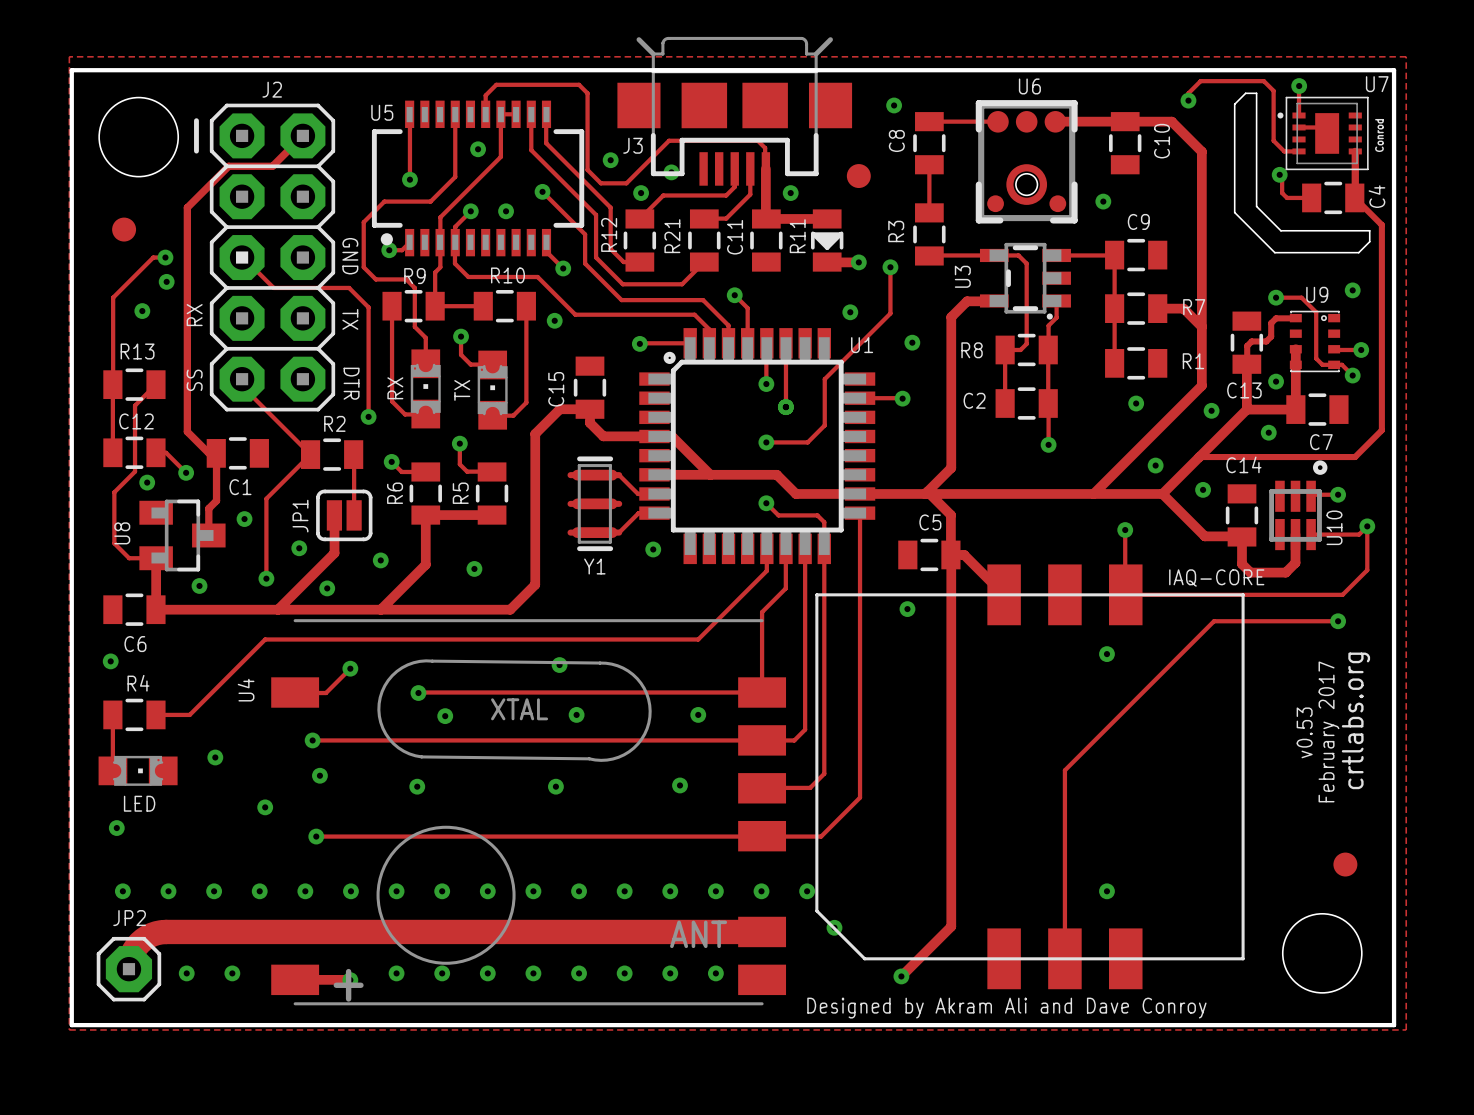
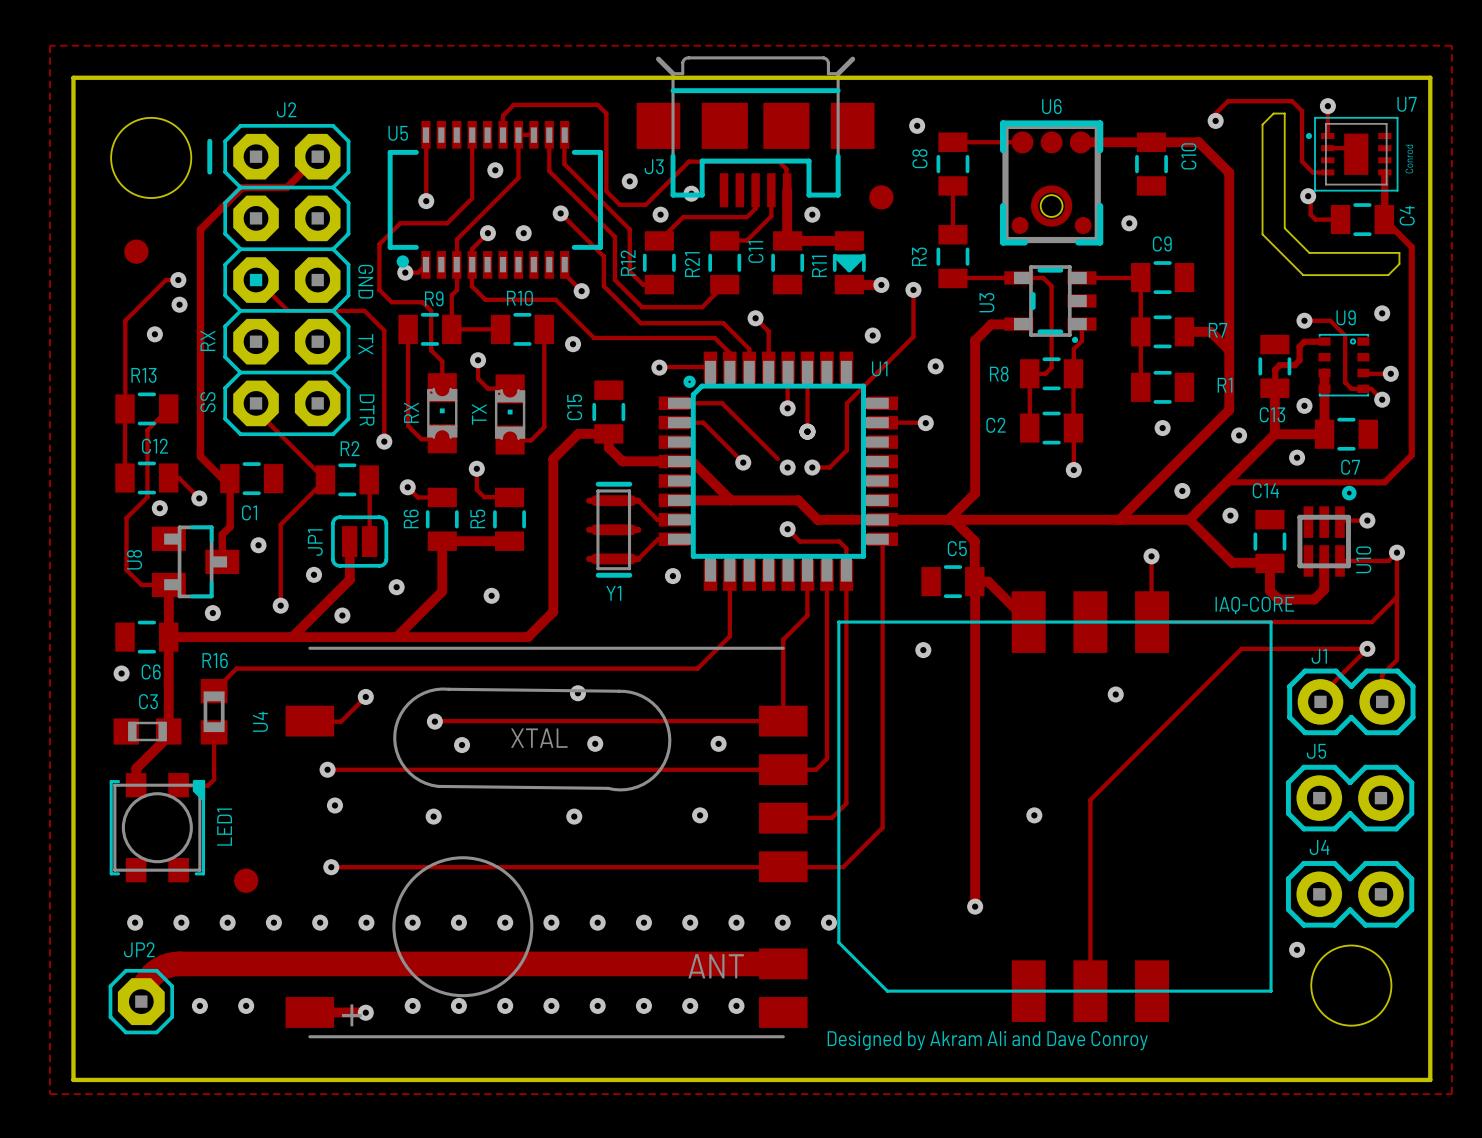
zone outline: (69, 56) (1406, 56) (1406, 1029) (69, 1029) (69, 56) -> (50, 45) (50, 1094) (1451, 1094) (1451, 45) (50, 45)
board edge: (71, 70) (71, 1025) (1394, 1025) (1394, 70) (71, 70) -> (73, 77) (73, 1079) (1430, 1079) (1430, 77) (73, 77)
track: none -> (674, 403) (722, 403) (777, 458)
track: none -> (674, 422) (703, 422) (743, 462)
via: none -> (743, 462)
track: (766, 442) (790, 442) -> none
via: none -> (812, 467)
track: none -> (729, 575) (729, 636) (697, 668) (236, 668) (214, 691)
track: (766, 548) (766, 570) (698, 639) (265, 639) (189, 714) (155, 714) -> none
track: none -> (1396, 597) (1396, 659) (1382, 674) (1382, 701)
track: none -> (168, 637) (168, 731)
via position: (907, 609) -> (923, 650)
track: none -> (1367, 648) (1320, 695) (1320, 701)
via position: (1106, 654) -> (1115, 694)
via position: (110, 661) -> (121, 673)
J1: none -> (1351, 701)
R16: none -> (214, 711)
C3: none -> (147, 731)
track: none -> (168, 731) (168, 736) (136, 768) (136, 784)
track: none -> (214, 732) (214, 779) (207, 785) (178, 785)
track: (112, 714) (112, 770) -> none
R4: (134, 714) -> none
text: crtlabs.org (1355, 720) -> none
text: February 2017 (1328, 731) -> none
text: v0.53 (1304, 732) -> none
via: (215, 757) -> none
J5: none -> (1350, 798)
LED: (138, 770) -> none
via: none -> (1034, 815)
LED1: none -> (157, 827)
via: (265, 807) -> none
via: (116, 828) -> none
part: none -> (246, 880)
J4: none -> (1350, 894)
part: (1345, 864) -> none
track: (951, 875) (951, 926) (901, 976) -> none
via: none -> (975, 906)
via: (1106, 891) -> none
via: none -> (1297, 949)
via: (834, 927) -> none
via: (901, 976) -> none

